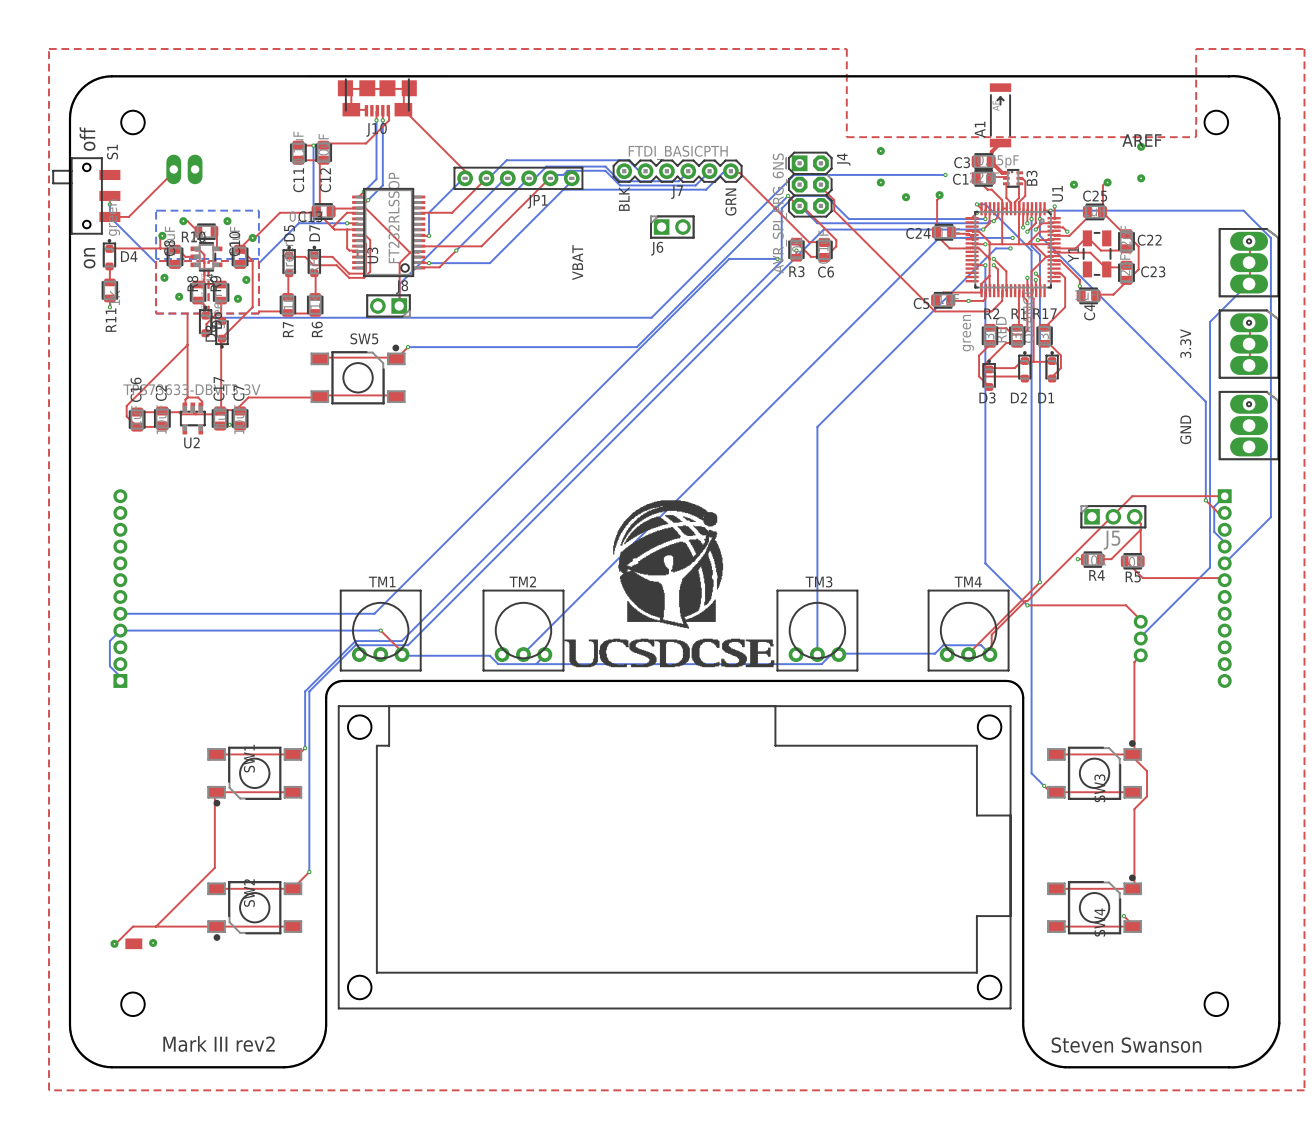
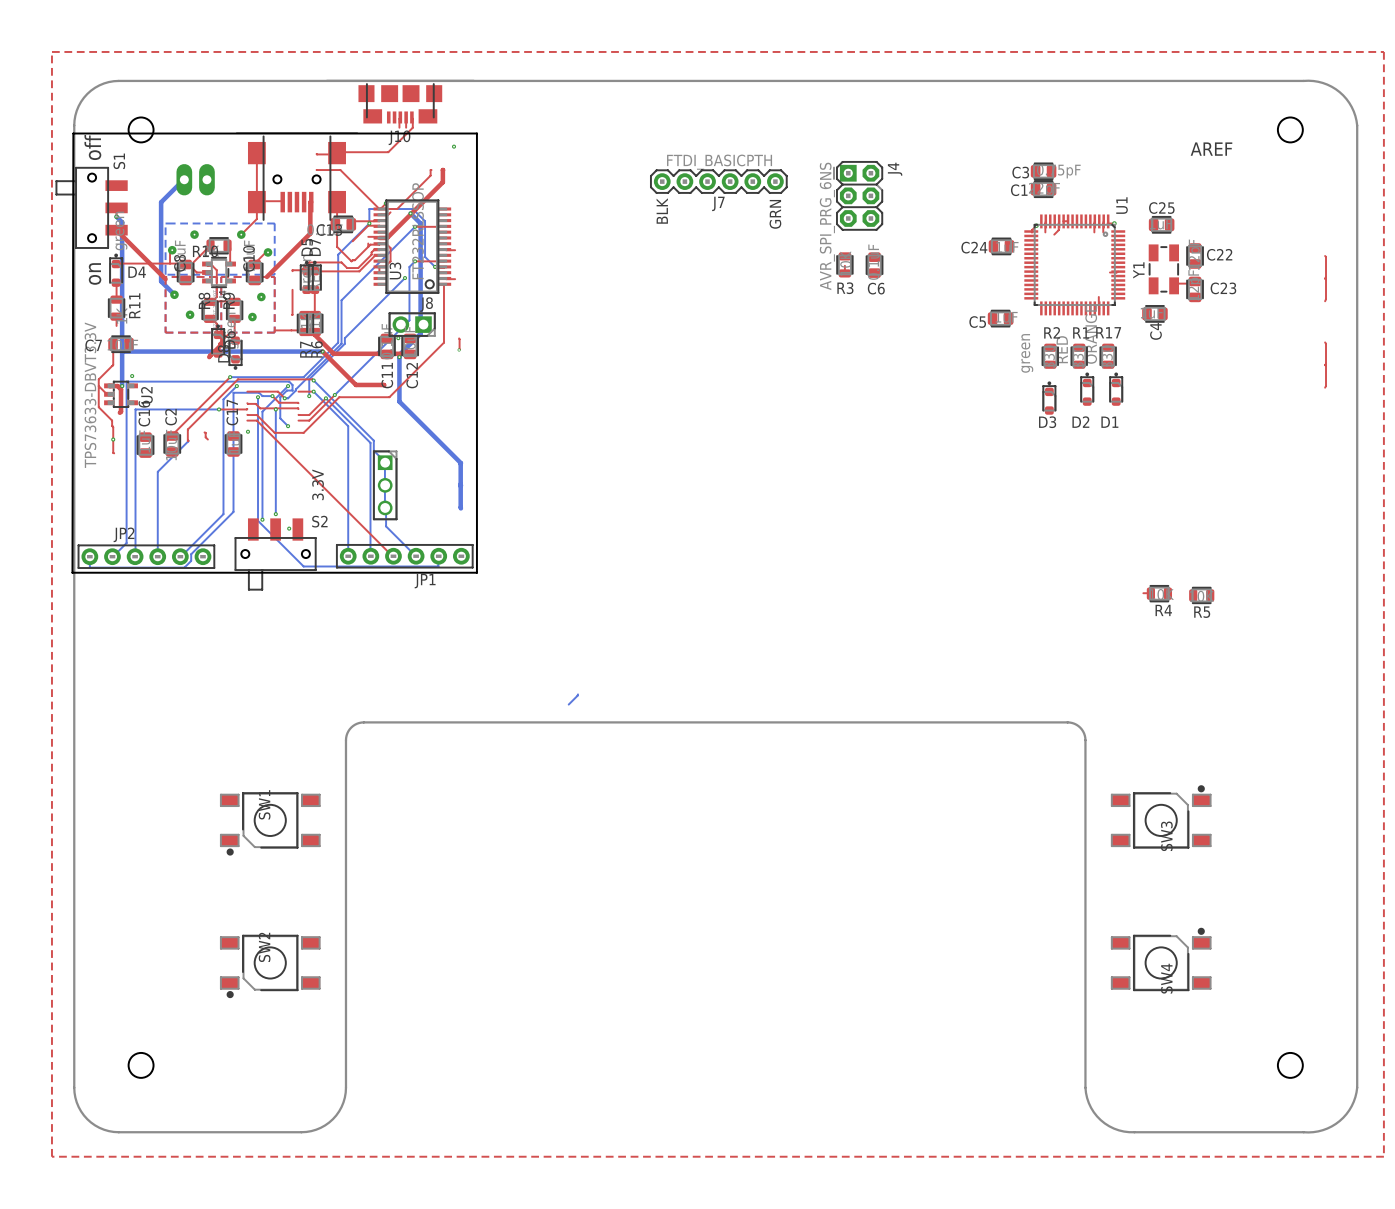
top zone outline: (846, 49) (846, 137) (1196, 137) (1196, 49) -> (898, 51) (1268, 51)
board edge: (111, 76) (1233, 76) (1251, 79) (1262, 86) (1274, 100) (1279, 118) (1279, 1023) (1276, 1036) (1269, 1048) (1255, 1061) (1233, 1067) (1065, 1067) (1046, 1061) (1031, 1049) (1024, 1035) (1023, 1026) (1023, 697) (1020, 689) (1012, 682) (342, 680) (331, 685) (326, 697) (326, 1025) (323, 1039) (319, 1047) (306, 1060) (298, 1064) (284, 1067) (111, 1067) (98, 1064) (85, 1058) (74, 1043) (69, 1025) (69, 118) (72, 104) (82, 88) (98, 78) (111, 76) -> none
top track: (366, 110) (351, 109) (351, 88) (345, 88) (409, 88) (403, 88) (403, 109) (464, 170) (465, 178) -> none
A1: (1000, 115) -> none
bottom track: (376, 120) (376, 179) (363, 191) -> none
via: (376, 120) -> none
bottom track: (382, 120) (382, 185) (368, 200) -> none
via: (382, 120) -> none
board edge: none -> (73, 133) (72, 572) (476, 572) (476, 133) (73, 133)
via: none -> (454, 146)
top track: (1000, 143) (991, 151) (991, 161) (1002, 172) (1006, 172) -> none
top track: none -> (256, 153) (256, 219) (241, 234)
bottom track: (313, 145) (313, 223) -> none
via: (313, 145) -> none
part: (1141, 146) -> none
part: (880, 151) -> none
C11 position: (298, 152) -> (386, 346)
C12 position: (323, 152) -> (410, 346)
top track: (320, 160) (323, 160) (319, 160) (319, 214) (316, 211) -> (340, 170) (379, 209) (397, 209) (430, 175) (431, 170)
top track: none -> (443, 170) (442, 182) (387, 237) (379, 237)
top track: (976, 161) (976, 178) (1002, 200) (1002, 244) -> none
part: none -> (296, 176)
top track: (173, 169) (174, 170) (128, 216) (109, 216) -> (165, 279) (116, 230)
bottom track: none -> (184, 179) (161, 202) (161, 281) (174, 294)
bottom track: (645, 171) (638, 170) (628, 160) (506, 160) (487, 179) (486, 178) -> none
bottom track: (688, 171) (678, 181) (620, 181) (605, 166) (546, 166) (533, 179) (527, 179) (456, 250) -> none
bottom track: (709, 171) (695, 185) (620, 185) (605, 170) (567, 170) (563, 174) (550, 174) (550, 178) -> none
top track: (730, 171) (731, 172) (739, 172) (809, 242) (824, 242) -> none
bottom track: (730, 171) (722, 172) (706, 189) (563, 189) -> none
bottom track: (945, 174) (794, 174) (651, 317) (208, 317) (204, 313) -> none
via: (945, 174) -> none
bottom track: (465, 178) (429, 212) (429, 235) -> none
top track: (486, 178) (452, 212) (419, 213) -> (415, 226) (444, 226)
bottom track: (507, 178) (506, 177) (399, 284) (399, 305) -> none
JP1 position: (518, 178) -> (404, 556)
top track: (550, 178) (481, 246) (419, 246) -> (415, 261) (444, 261)
bottom track: (571, 178) (571, 181) (489, 263) (429, 263) -> none
top track: (991, 178) (1006, 178) -> none
B3: (1013, 178) -> none
top track: (1019, 178) (1025, 181) (1025, 195) (1018, 202) (1018, 244) -> none
part: (1141, 178) -> none
part: (880, 182) -> none
top track: (1107, 182) (1102, 185) (1102, 211) (1138, 246) (1138, 269) (1113, 294) (1096, 295) -> none
part: (1107, 182) -> none
top track: (1006, 183) (1006, 198) (1010, 202) (1010, 208) -> none
top track: (1019, 183) (1018, 198) (1014, 202) (1015, 208) -> none
top track: (820, 184) (819, 185) (834, 200) (834, 210) (934, 311) (991, 311) (1002, 300) (1002, 290) -> none
part: (1073, 184) -> none
top track: none -> (256, 201) (282, 202)
top track: none -> (311, 202) (310, 233) (266, 276)
top track: (788, 195) (798, 206) (800, 204) (836, 240) (836, 246) (825, 256) (811, 256) (796, 241) -> none
bottom track: (788, 195) (636, 347) (408, 347) -> none
via: (788, 195) -> none
top track: (939, 195) (941, 195) (937, 200) (937, 231) (934, 233) (949, 248) (979, 248) (989, 258) -> none
part: (939, 195) -> none
part: (906, 197) -> none
via: (368, 200) -> none
bottom track: none -> (410, 213) (420, 223) (420, 333) (399, 354) (399, 401) (460, 463) (460, 508)
via: none -> (410, 213)
bottom track: (109, 204) (109, 216) (156, 263) -> (116, 216) (122, 222) (122, 386)
top track: (976, 204) (981, 208) -> none
bottom track: (976, 204) (985, 204) (1031, 250) (1031, 773) (1044, 785) -> none
via: (976, 204) -> none
bottom track: (799, 205) (817, 223) (987, 223) (993, 221) -> none
top track: (1054, 206) (1054, 218) -> none
via: (1054, 206) -> none
top track: (357, 207) (366, 208) (410, 252) (399, 263) (399, 305) -> none
top track: (989, 208) (989, 223) (983, 229) -> none
top track: (1023, 208) (1023, 227) -> none
top track: (1027, 208) (1027, 223) -> none
top track: (1036, 208) (1035, 223) (1027, 231) -> none
via: none -> (369, 223)
bottom track: (1050, 210) (1243, 210) (1270, 237) (1270, 517) (1224, 563) -> none
top track: (316, 211) (334, 229) (357, 229) -> none
top track: (316, 211) (279, 212) (252, 237) -> none
top track: (1087, 211) (1086, 219) (1069, 235) (1054, 235) -> none
bottom track: none -> (415, 226) (341, 300) (341, 343) (288, 398) (284, 398)
via: none -> (415, 226)
bottom track: (985, 219) (848, 219) (825, 195) (794, 195) (781, 208) (781, 261) (401, 641) (355, 641) (305, 691) (305, 748) -> none
via: (985, 219) -> none
bottom track: (1031, 219) (1031, 246) (1039, 254) (1039, 582) -> none
via: (1031, 219) -> none
bottom track: (1039, 219) (1039, 235) (1205, 401) (1205, 500) -> none
via: (1039, 219) -> none
top track: (183, 221) (187, 221) (198, 231) -> (190, 265) (210, 245)
via: (993, 221) -> none
top track: (1054, 222) (1042, 223) (1035, 229) -> none
bottom track: (347, 223) (298, 223) (258, 263) -> none
via: (347, 223) -> none
via: (1027, 223) -> none
top track: (1054, 226) (1063, 227) (1067, 231) -> none
J6: (672, 227) -> none
via: (1023, 227) -> none
bottom track: (983, 229) (823, 229) (408, 645) (355, 645) (309, 691) (309, 872) -> none
via: (983, 229) -> none
via: (1035, 229) -> none
top track: (972, 230) (979, 231) (989, 242) (989, 290) -> none
top track: (1054, 230) (1039, 231) (1027, 244) -> none
via: (1027, 231) -> none
via: (1067, 231) -> none
top track: (347, 232) (347, 248) (349, 250) (357, 250) (357, 252) -> (337, 202) (337, 246) (351, 261) (370, 244) (386, 243) (390, 247) (390, 261) (384, 266) (379, 268)
top track: (951, 232) (968, 233) (972, 235) (972, 239) -> none
top track: (357, 235) (366, 235) (370, 240) (370, 271) (363, 277) (349, 277) (336, 265) (313, 265) (305, 256) (289, 255) -> (379, 249) (373, 250) (358, 268) (347, 268) (341, 262) (309, 262) (301, 270) (292, 271)
via: (429, 235) -> none
bottom track: (1012, 237) (939, 237) (523, 654) -> none
via: (1012, 237) -> none
top track: (1054, 239) (1037, 240) -> none
top track: (357, 240) (361, 240) (366, 244) (366, 271) (363, 273) (349, 273) (332, 256) (314, 255) -> (379, 255) (374, 255) (359, 271) (314, 271)
via: (1037, 240) -> none
top track: (972, 243) (985, 244) -> none
top track: (1054, 243) (989, 244) -> none
via: (985, 244) -> none
top track: (1033, 244) (1046, 256) (1031, 271) (1033, 361) -> none
bottom track: none -> (415, 261) (409, 266) (409, 320) (334, 394)
via: none -> (415, 261)
top track: (1054, 247) (1075, 248) (1088, 237) (1100, 250) (1126, 250) (1126, 248) -> none
top track: (240, 248) (252, 261) (252, 307) (221, 338) (221, 410) -> none
bottom track: (1010, 248) (995, 248) (817, 426) (817, 654) -> none
via: (1010, 248) -> none
top track: (456, 250) (439, 267) (419, 267) -> (247, 414) (256, 415) (274, 432) (303, 432) (339, 397) (389, 397) (443, 342) (444, 284)
via: (456, 250) -> none
via: (796, 250) -> none
bottom track: none -> (435, 266) (425, 256) (425, 221) (412, 209) (369, 209) (369, 223) (338, 254) (338, 342) (303, 377) (230, 377)
via: none -> (435, 266)
top track: (1054, 251) (1090, 252) (1106, 269) -> none
bottom track: (777, 258) (729, 258) (374, 613) (120, 613) -> none
via: (777, 258) -> none
top track: (993, 258) (1006, 271) (1006, 290) -> none
via: (993, 258) -> none
top track: (1054, 260) (1060, 261) (1079, 279) (1081, 295) -> none
D7 position: (314, 261) -> (314, 277)
bottom track: none -> (405, 278) (344, 338) (344, 343) (309, 379) (309, 396)
via: none -> (405, 278)
VBAT: (1249, 262) -> none
via: (429, 263) -> none
top track: (972, 264) (985, 265) -> none
bottom track: (985, 265) (985, 563) (1027, 605) -> none
via: (985, 265) -> none
top track: (993, 265) (997, 269) (998, 290) -> none
via: (993, 265) -> none
top track: (1054, 272) (1060, 273) (1065, 277) (1065, 307) (1044, 327) -> none
top track: none -> (292, 289) (292, 314)
top track: (289, 273) (287, 296) -> none
top track: none -> (314, 289) (314, 314)
top track: (314, 273) (315, 296) -> none
top track: (1035, 273) (1039, 277) (1040, 290) -> none
via: (1035, 273) -> none
top track: (989, 275) (981, 284) (981, 292) (943, 292) (935, 300) -> none
top track: (1027, 277) (1027, 290) -> none
via: (1027, 277) -> none
via: (1035, 279) -> none
bottom track: (1249, 283) (1210, 321) (1210, 567) (1140, 638) -> none
via: (1079, 286) -> none
top track: (985, 290) (985, 298) (983, 300) (950, 300) -> none
top track: (1019, 290) (1018, 326) (1017, 327) -> none
top track: (1023, 290) (1023, 296) (1027, 300) (1027, 330) (1023, 334) (1012, 334) (1006, 328) (989, 327) -> none
via: (968, 300) -> none
R6 position: (315, 304) -> (314, 323)
via: (109, 307) -> none
3.3V footprint: [1219, 309, 1279, 379] -> [373, 450, 398, 520]
top track: none -> (314, 332) (314, 334) (333, 353) (410, 354)
top track: (315, 312) (296, 313) -> none
top track: (187, 313) (187, 397) -> none
top track: none -> (222, 332) (222, 343) (209, 357)
via: none -> (398, 338)
top track: none -> (459, 338) (459, 349)
R11 name position: R11 (111, 320) -> R11 (134, 305)
top track: none -> (113, 344) (113, 365) (98, 379) (98, 407) (112, 420) (114, 453)
part: none -> (459, 349)
bottom track: none -> (122, 351) (322, 351)
top track: none -> (322, 351) (356, 384) (384, 385)
via: none -> (322, 351)
via: none -> (399, 357)
top track: (989, 343) (979, 355) (979, 376) (989, 386) -> none
top track: (1017, 343) (1006, 342) (983, 366) (983, 374) (985, 376) (1023, 376) (1024, 378) -> none
top track: (1044, 343) (1050, 345) (1060, 355) (1060, 368) (1052, 378) -> none
top track: (187, 345) (126, 405) (126, 416) (137, 426) (162, 426) -> none
top track: (408, 347) (396, 358) (319, 358) -> none
via: (408, 347) -> none
via: none -> (132, 376)
top track: none -> (230, 377) (166, 440)
via: none -> (230, 377)
top track: none -> (313, 380) (237, 379) (187, 429) (188, 440)
bottom track: none -> (313, 380) (373, 440) (373, 450) (385, 462) (386, 526) (416, 556)
via: none -> (313, 380)
top track: (1052, 361) (1025, 361) (1023, 359) (1014, 368) (989, 369) -> none
top track: none -> (98, 386) (109, 394)
top track: none -> (109, 385) (117, 386) (121, 389) (119, 412)
via: none -> (122, 386)
bottom track: none -> (236, 386) (223, 399) (223, 514) (180, 556)
via: none -> (236, 386)
bottom track: none -> (288, 386) (262, 411) (262, 519)
via: none -> (288, 386)
top track: none -> (247, 391) (278, 391) (284, 398)
top track: none -> (298, 391) (313, 391)
bottom track: none -> (313, 391) (348, 426) (348, 556)
via: none -> (313, 391)
top track: none -> (334, 394) (309, 420) (298, 420)
via: none -> (334, 394)
top track: none -> (272, 396) (279, 402) (298, 403)
bottom track: none -> (272, 396) (262, 396) (259, 392) (233, 392) (233, 511) (191, 554) (191, 560) (184, 567) (89, 567) (89, 556)
via: none -> (272, 396)
via: none -> (309, 396)
bottom track: none -> (258, 397) (258, 520) (303, 566) (438, 566) (438, 556)
via: none -> (258, 397)
SW5: (358, 374) -> none
via: none -> (284, 398)
top track: none -> (325, 398) (309, 415) (298, 414)
bottom track: none -> (325, 398) (370, 442) (370, 556)
via: none -> (325, 398)
top track: none -> (247, 403) (255, 403) (260, 408) (298, 409)
bottom track: none -> (219, 409) (135, 409) (135, 556)
via: none -> (219, 409)
top track: none -> (247, 409) (219, 409)
bottom track: none -> (275, 409) (275, 514)
via: none -> (275, 409)
C7 name position: C7 (238, 393) -> C7 (93, 345)
top track: none -> (247, 420) (256, 420) (393, 556)
top track: (396, 396) (319, 395) (319, 397) (248, 397) (235, 410) (240, 410) (221, 410) -> none
top track: (187, 397) (198, 397) (202, 401) (200, 407) -> none
top track: (187, 397) (184, 407) -> none
bottom track: none -> (288, 426) (280, 418) (280, 397) (286, 390) (292, 390) (292, 384) (289, 381) (126, 381) (126, 543) (112, 556)
via: none -> (288, 426)
via: none -> (247, 431)
top track: (221, 410) (216, 414) (137, 412) -> none
via: none -> (113, 439)
bottom track: none -> (188, 440) (157, 471) (157, 556)
U2 rotation: 0° (192, 418) -> 90° counterclockwise (121, 394)
U2 position: (192, 418) -> (121, 394)
C7 rotation: 0° (240, 418) -> 90° clockwise (121, 344)
C7 position: (240, 418) -> (121, 344)
via: (229, 424) -> none
GND: (1249, 425) -> none
via: none -> (275, 514)
via: none -> (262, 519)
top track: (1224, 496) (1132, 496) (991, 634) (991, 653) (989, 654) -> none
bottom track: (1224, 496) (1214, 506) (1214, 531) (1224, 542) (1224, 546) -> none
via: none -> (289, 528)
drawing: [564, 500, 775, 668] -> none
top track: (1205, 500) (1218, 512) (1224, 512) -> none
via: (1205, 500) -> none
J5: (1113, 516) -> none
top track: (1134, 516) (1140, 523) (1140, 561) -> none
S2: none -> (275, 554)
JP2: none -> (146, 556)
top track: (1140, 529) (1111, 559) (1100, 559) -> none
via: (1077, 559) -> none
top track: (1124, 561) (1142, 578) (1222, 578) (1224, 580) -> none
top track: (1039, 582) (968, 654) -> none
via: (1039, 582) -> none
part: (120, 588) -> none
part: (1224, 588) -> none
top track: (1027, 605) (1126, 605) (1140, 621) -> none
via: (1027, 605) -> none
top track: (380, 630) (403, 653) (402, 654) -> none
bottom track: (380, 630) (120, 630) (109, 641) (109, 666) (120, 676) (120, 680) -> none
TM1: (380, 630) -> none
via: (380, 630) -> none
TM2: (523, 630) -> none
TM3: (817, 630) -> none
TM4: (968, 630) -> none
part: (1140, 638) -> none
bottom track: (402, 654) (489, 655) (498, 664) (821, 664) (830, 655) (838, 655) (840, 653) (934, 653) (943, 645) (981, 645) (989, 654) -> none
top track: (1140, 655) (1134, 662) (1134, 754) (1056, 754) -> none
top track: (305, 748) (298, 754) (216, 754) -> none
via: (305, 748) -> none
top track: (1130, 754) (1147, 771) (1147, 796) (1134, 809) (1134, 888) (1056, 888) -> none
top track: (1044, 785) (1050, 792) (1132, 792) -> none
via: (1044, 785) -> none
top track: (292, 792) (214, 792) (214, 867) (156, 926) -> none
part: (674, 857) -> none
top track: (309, 872) (292, 888) -> none
via: (309, 872) -> none
top track: (216, 888) (292, 888) -> none
top track: (1123, 916) (1134, 926) (1056, 926) -> none
via: (1123, 916) -> none
top track: (292, 926) (132, 926) (114, 943) -> none
part: (153, 942) -> none
part: (114, 943) -> none
part: (133, 943) -> none
text: Mark III rev2 (219, 1043) -> none
text: Steven Swanson (1126, 1045) -> none

